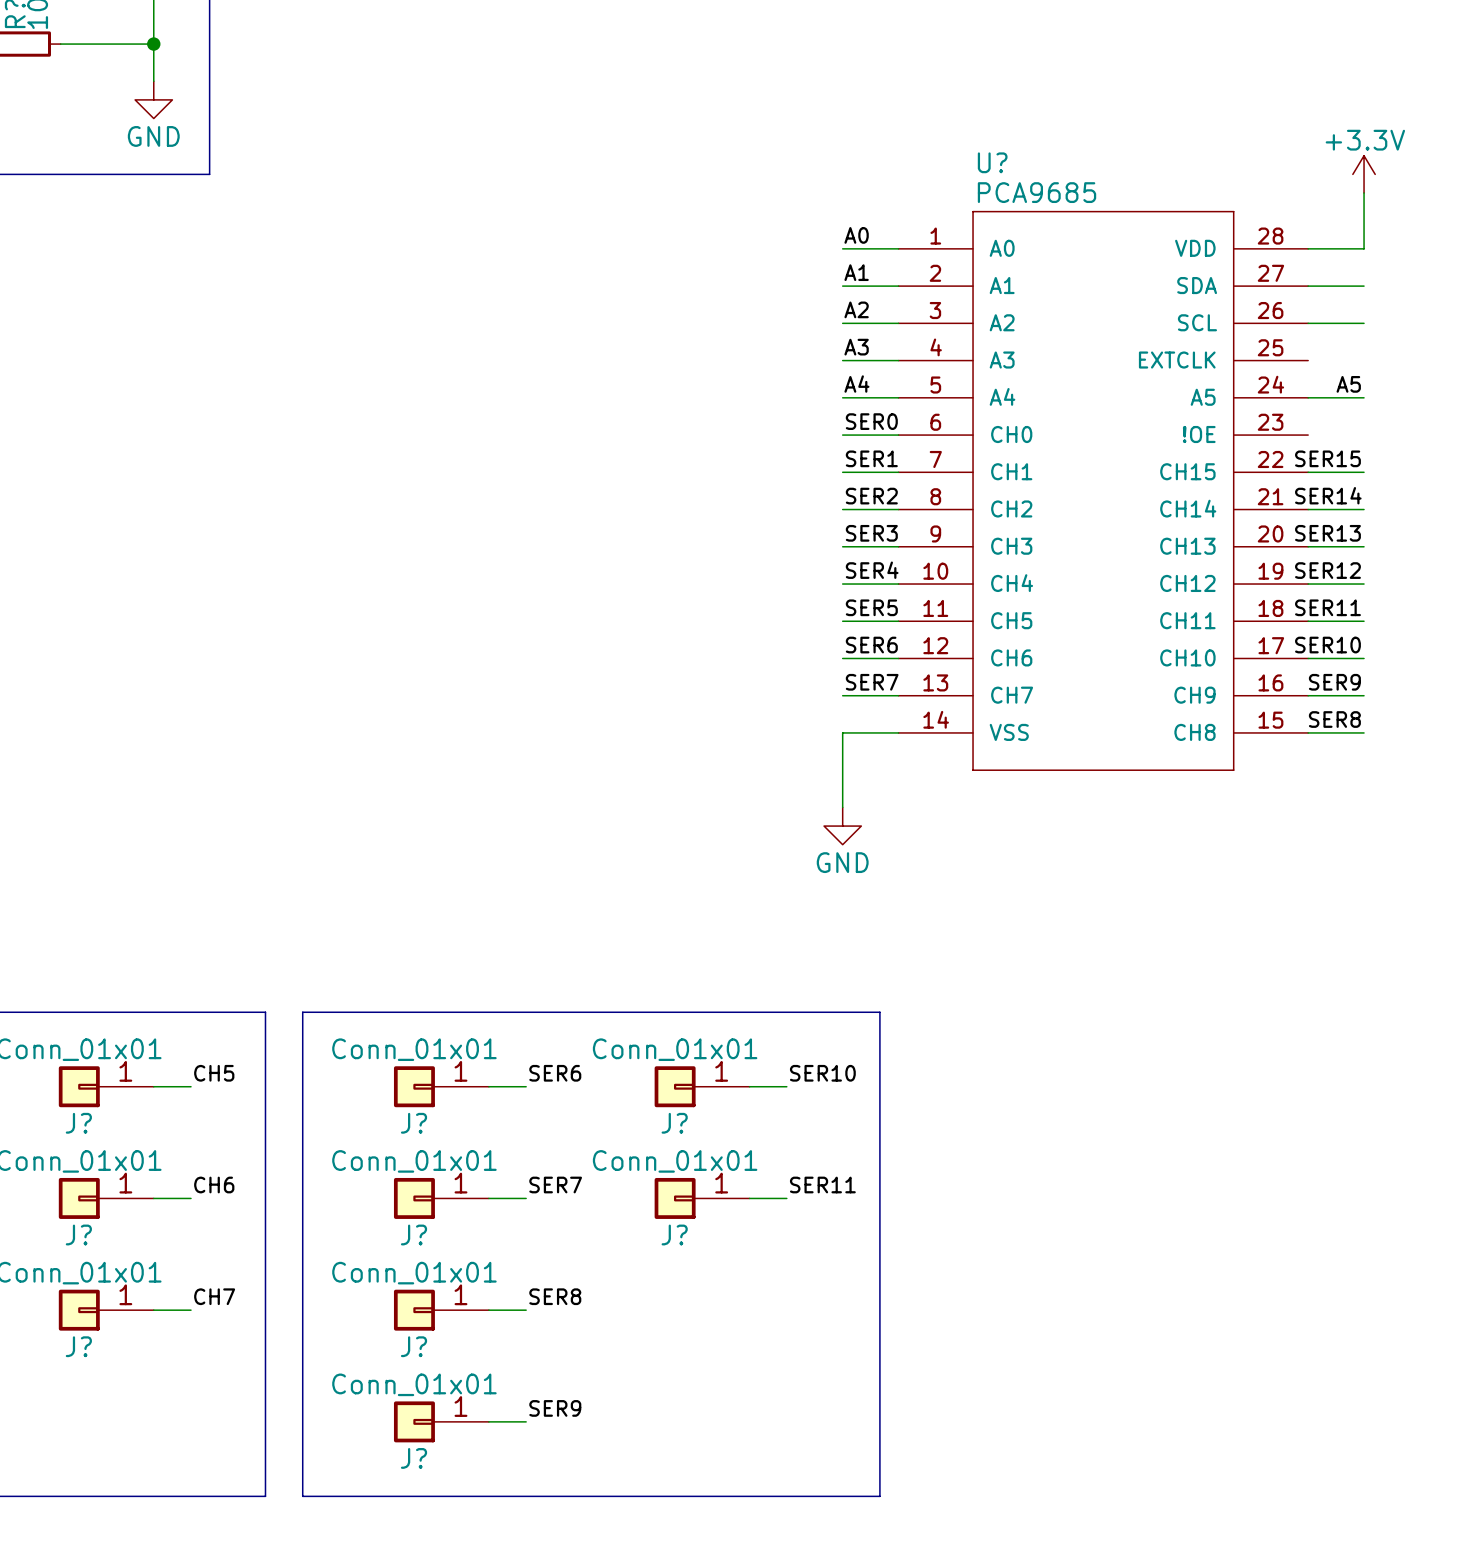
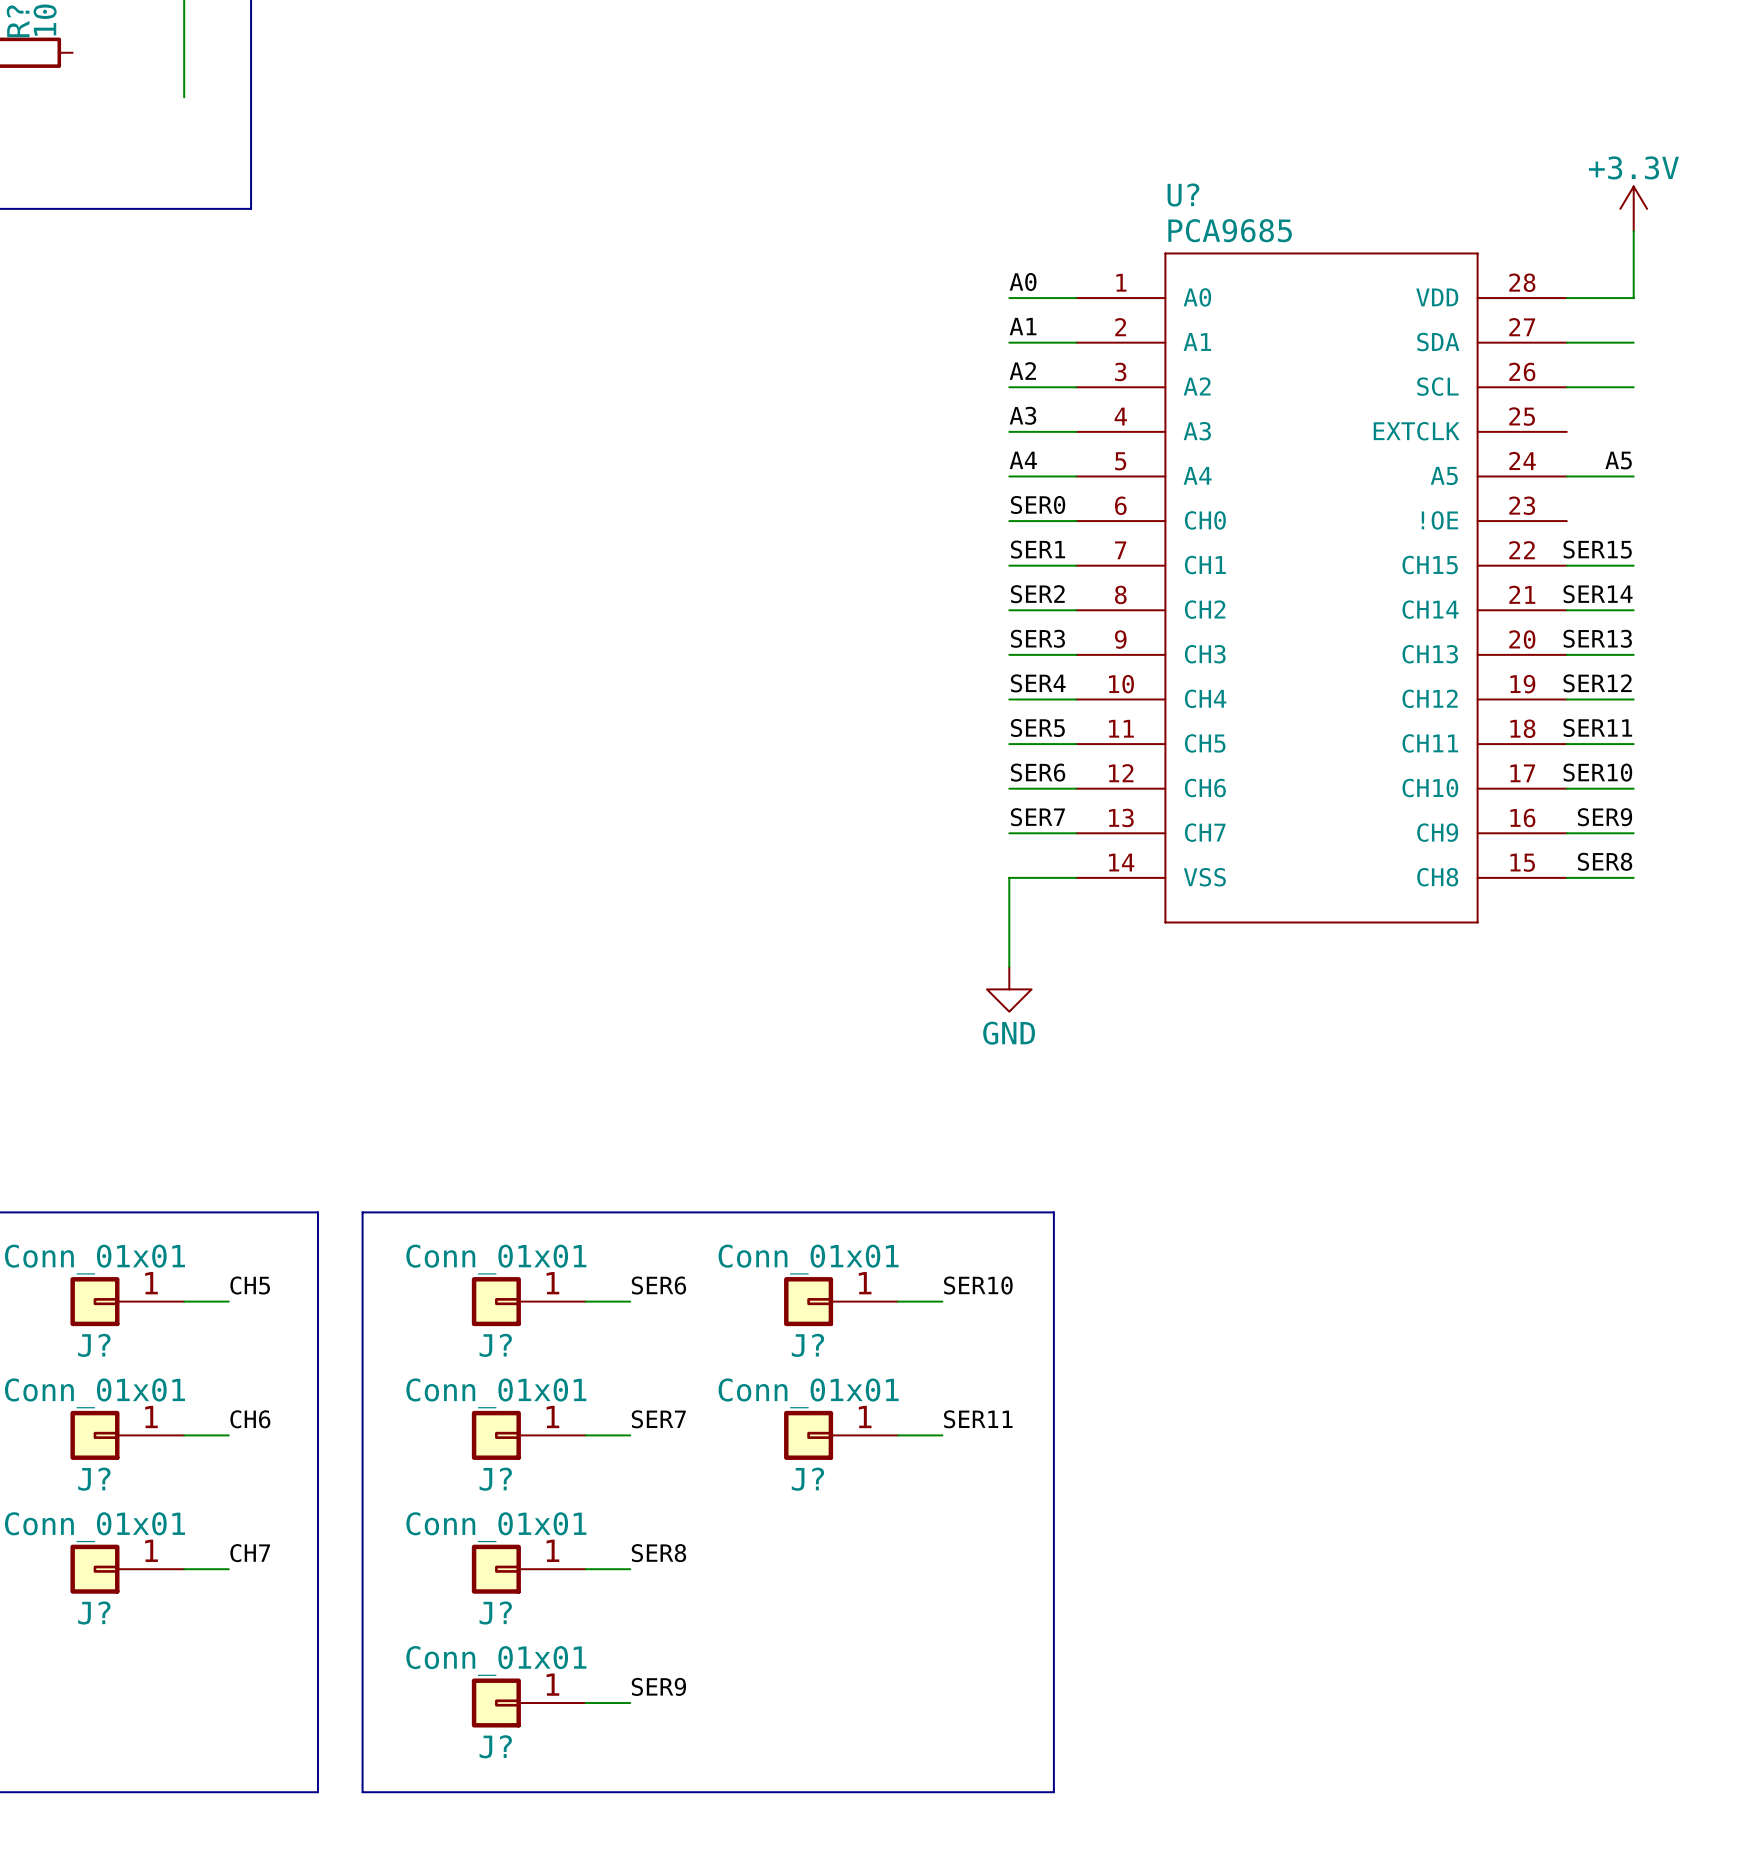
wire: (60, 44) (153, 44) -> none
junction: (153, 44) -> none
power symbol: GND (153, 99) -> none

